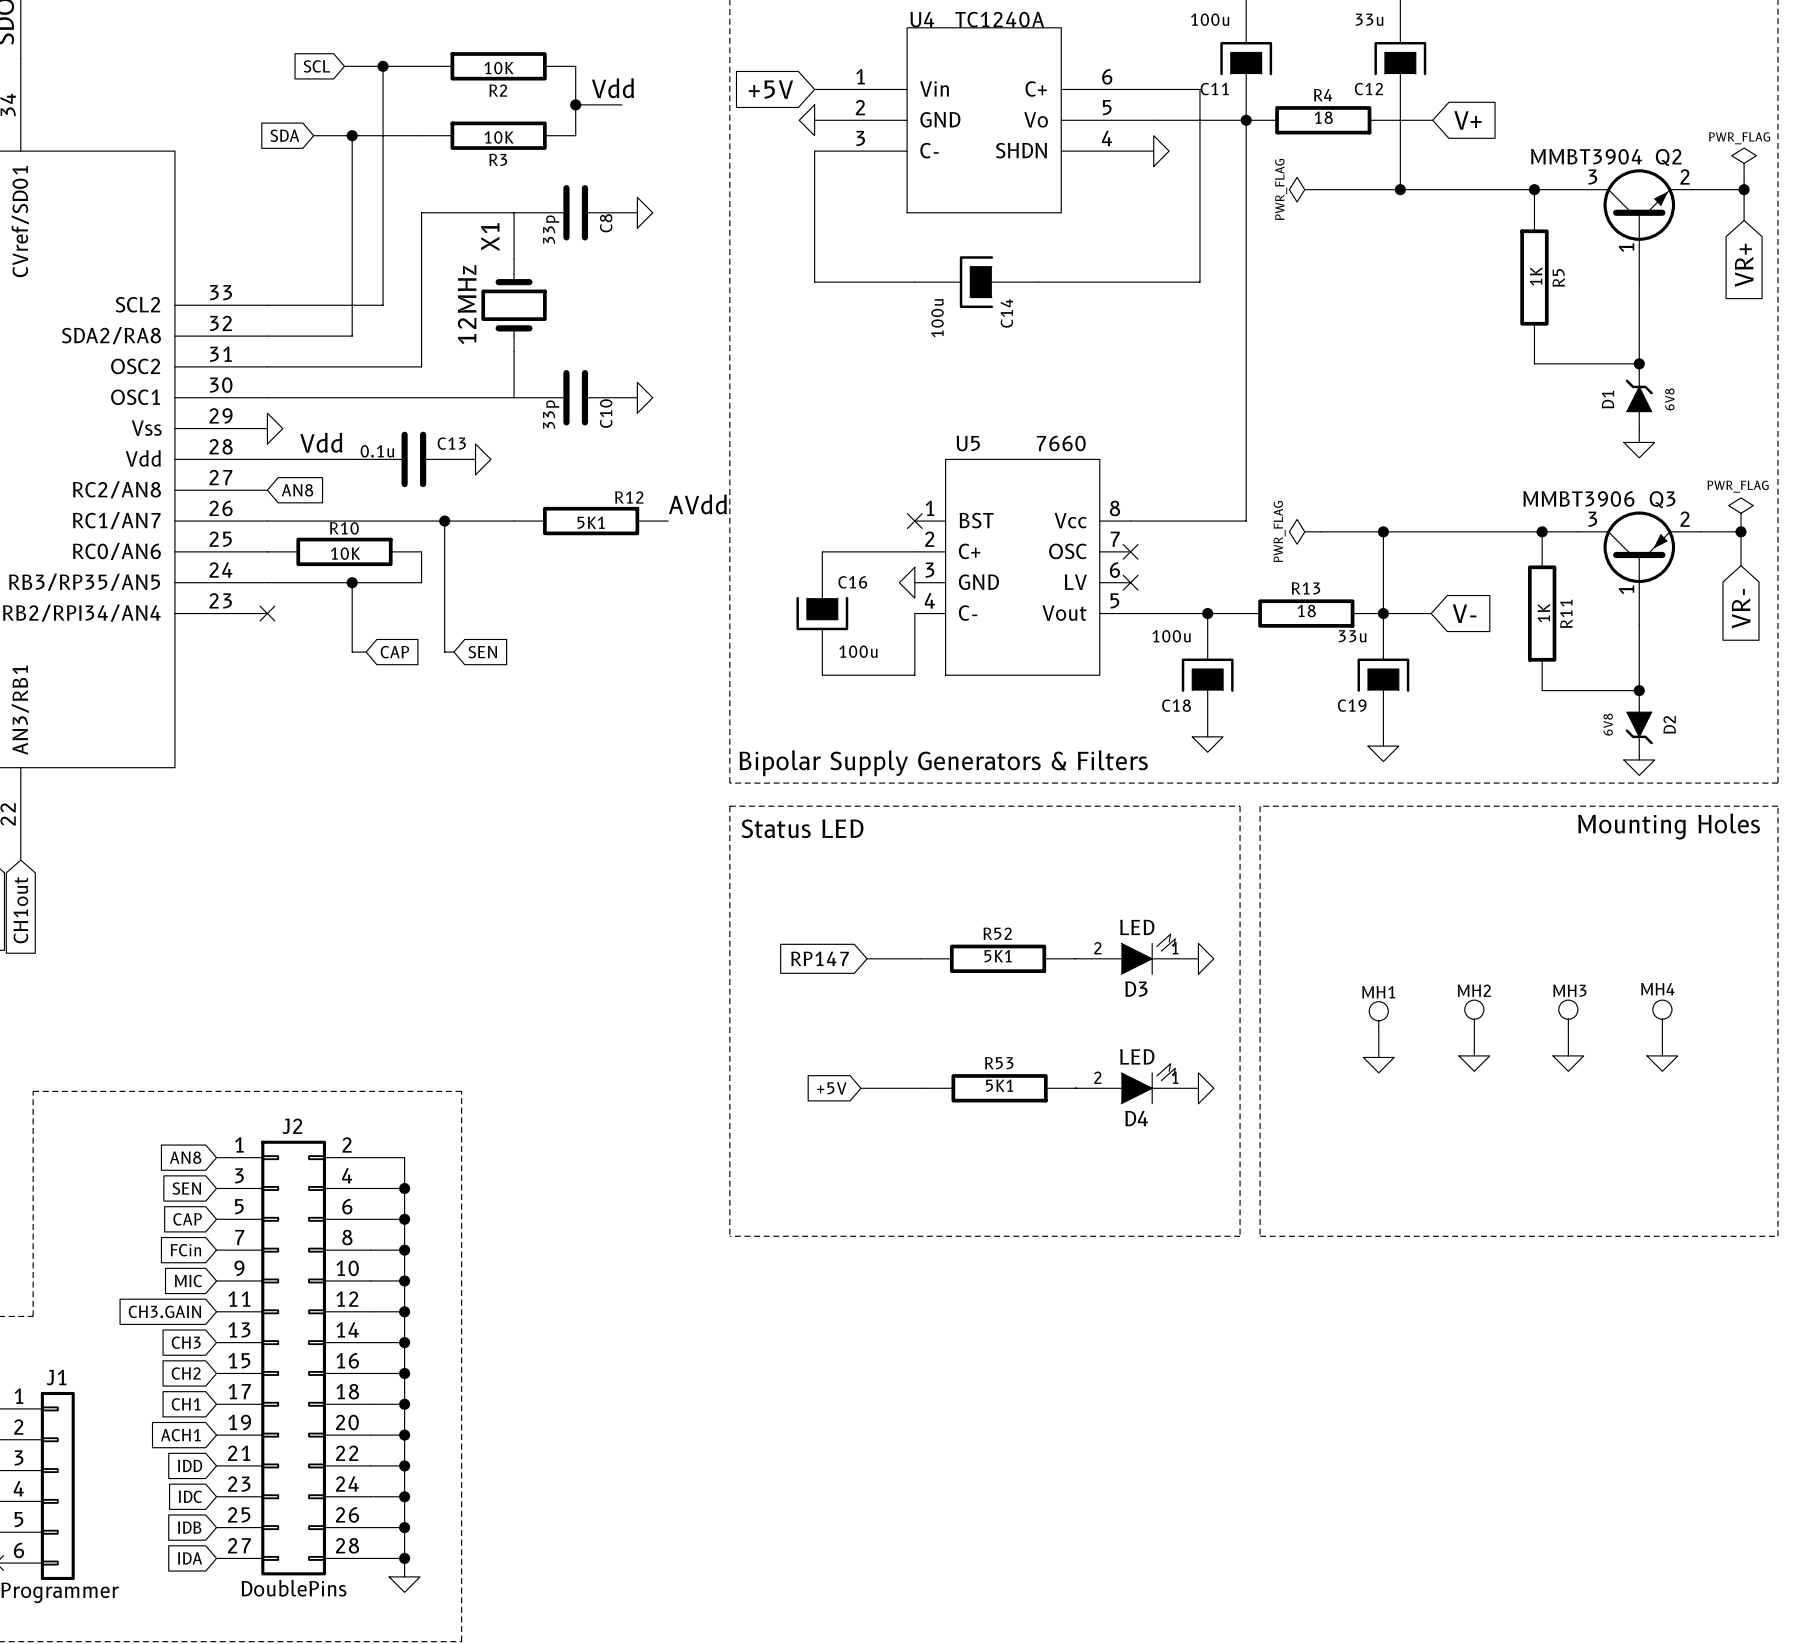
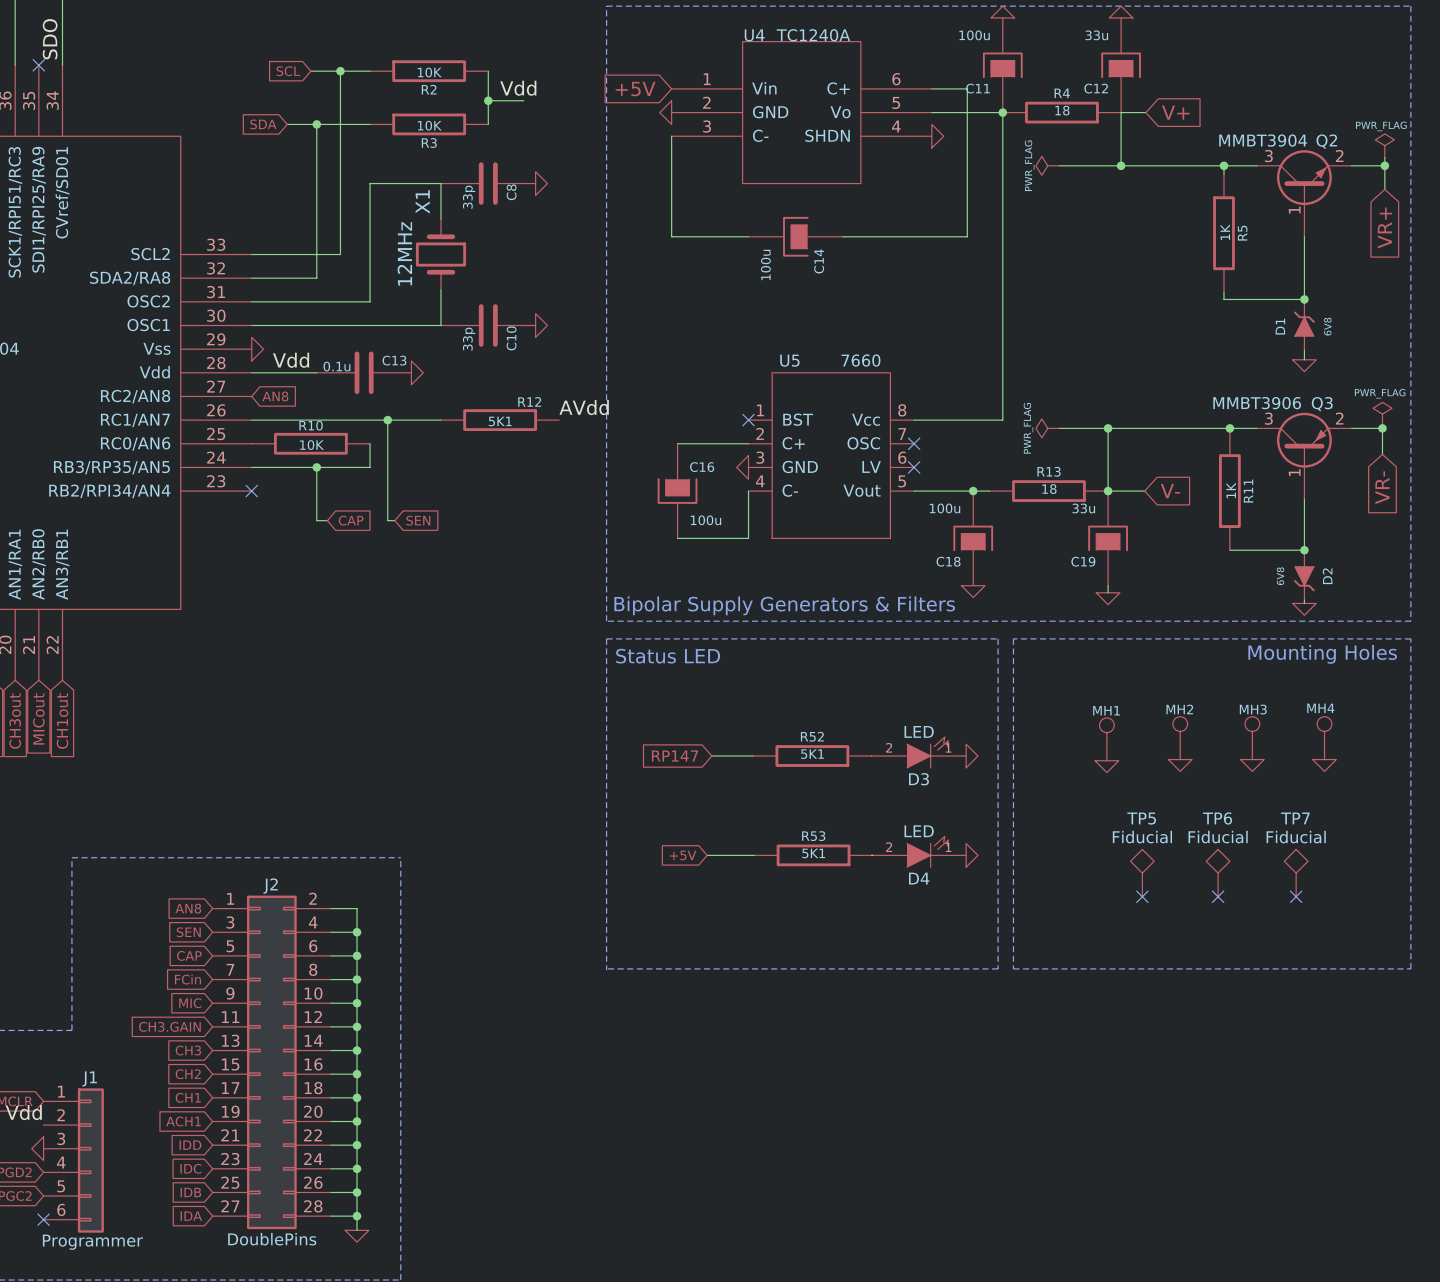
power symbol: none -> (1180, 765)
power symbol: none -> (1252, 765)
power symbol: none -> (1324, 765)
power symbol: none -> (1106, 766)
MH2 position: (1474, 1028) -> (1180, 738)
MH3 position: (1568, 1028) -> (1252, 738)
MH4 position: (1662, 1028) -> (1324, 738)
MH1 position: (1378, 1029) -> (1106, 739)
power symbol: (1474, 1063) -> none
power symbol: (1568, 1063) -> none
power symbol: (1662, 1063) -> none
power symbol: (1378, 1065) -> none
TP5: none -> Fiducial (1142, 873)
TP6: none -> Fiducial (1218, 873)
TP7: none -> Fiducial (1296, 873)
no-connect mark: none -> (1142, 896)
no-connect mark: none -> (1218, 896)
no-connect mark: none -> (1296, 896)

